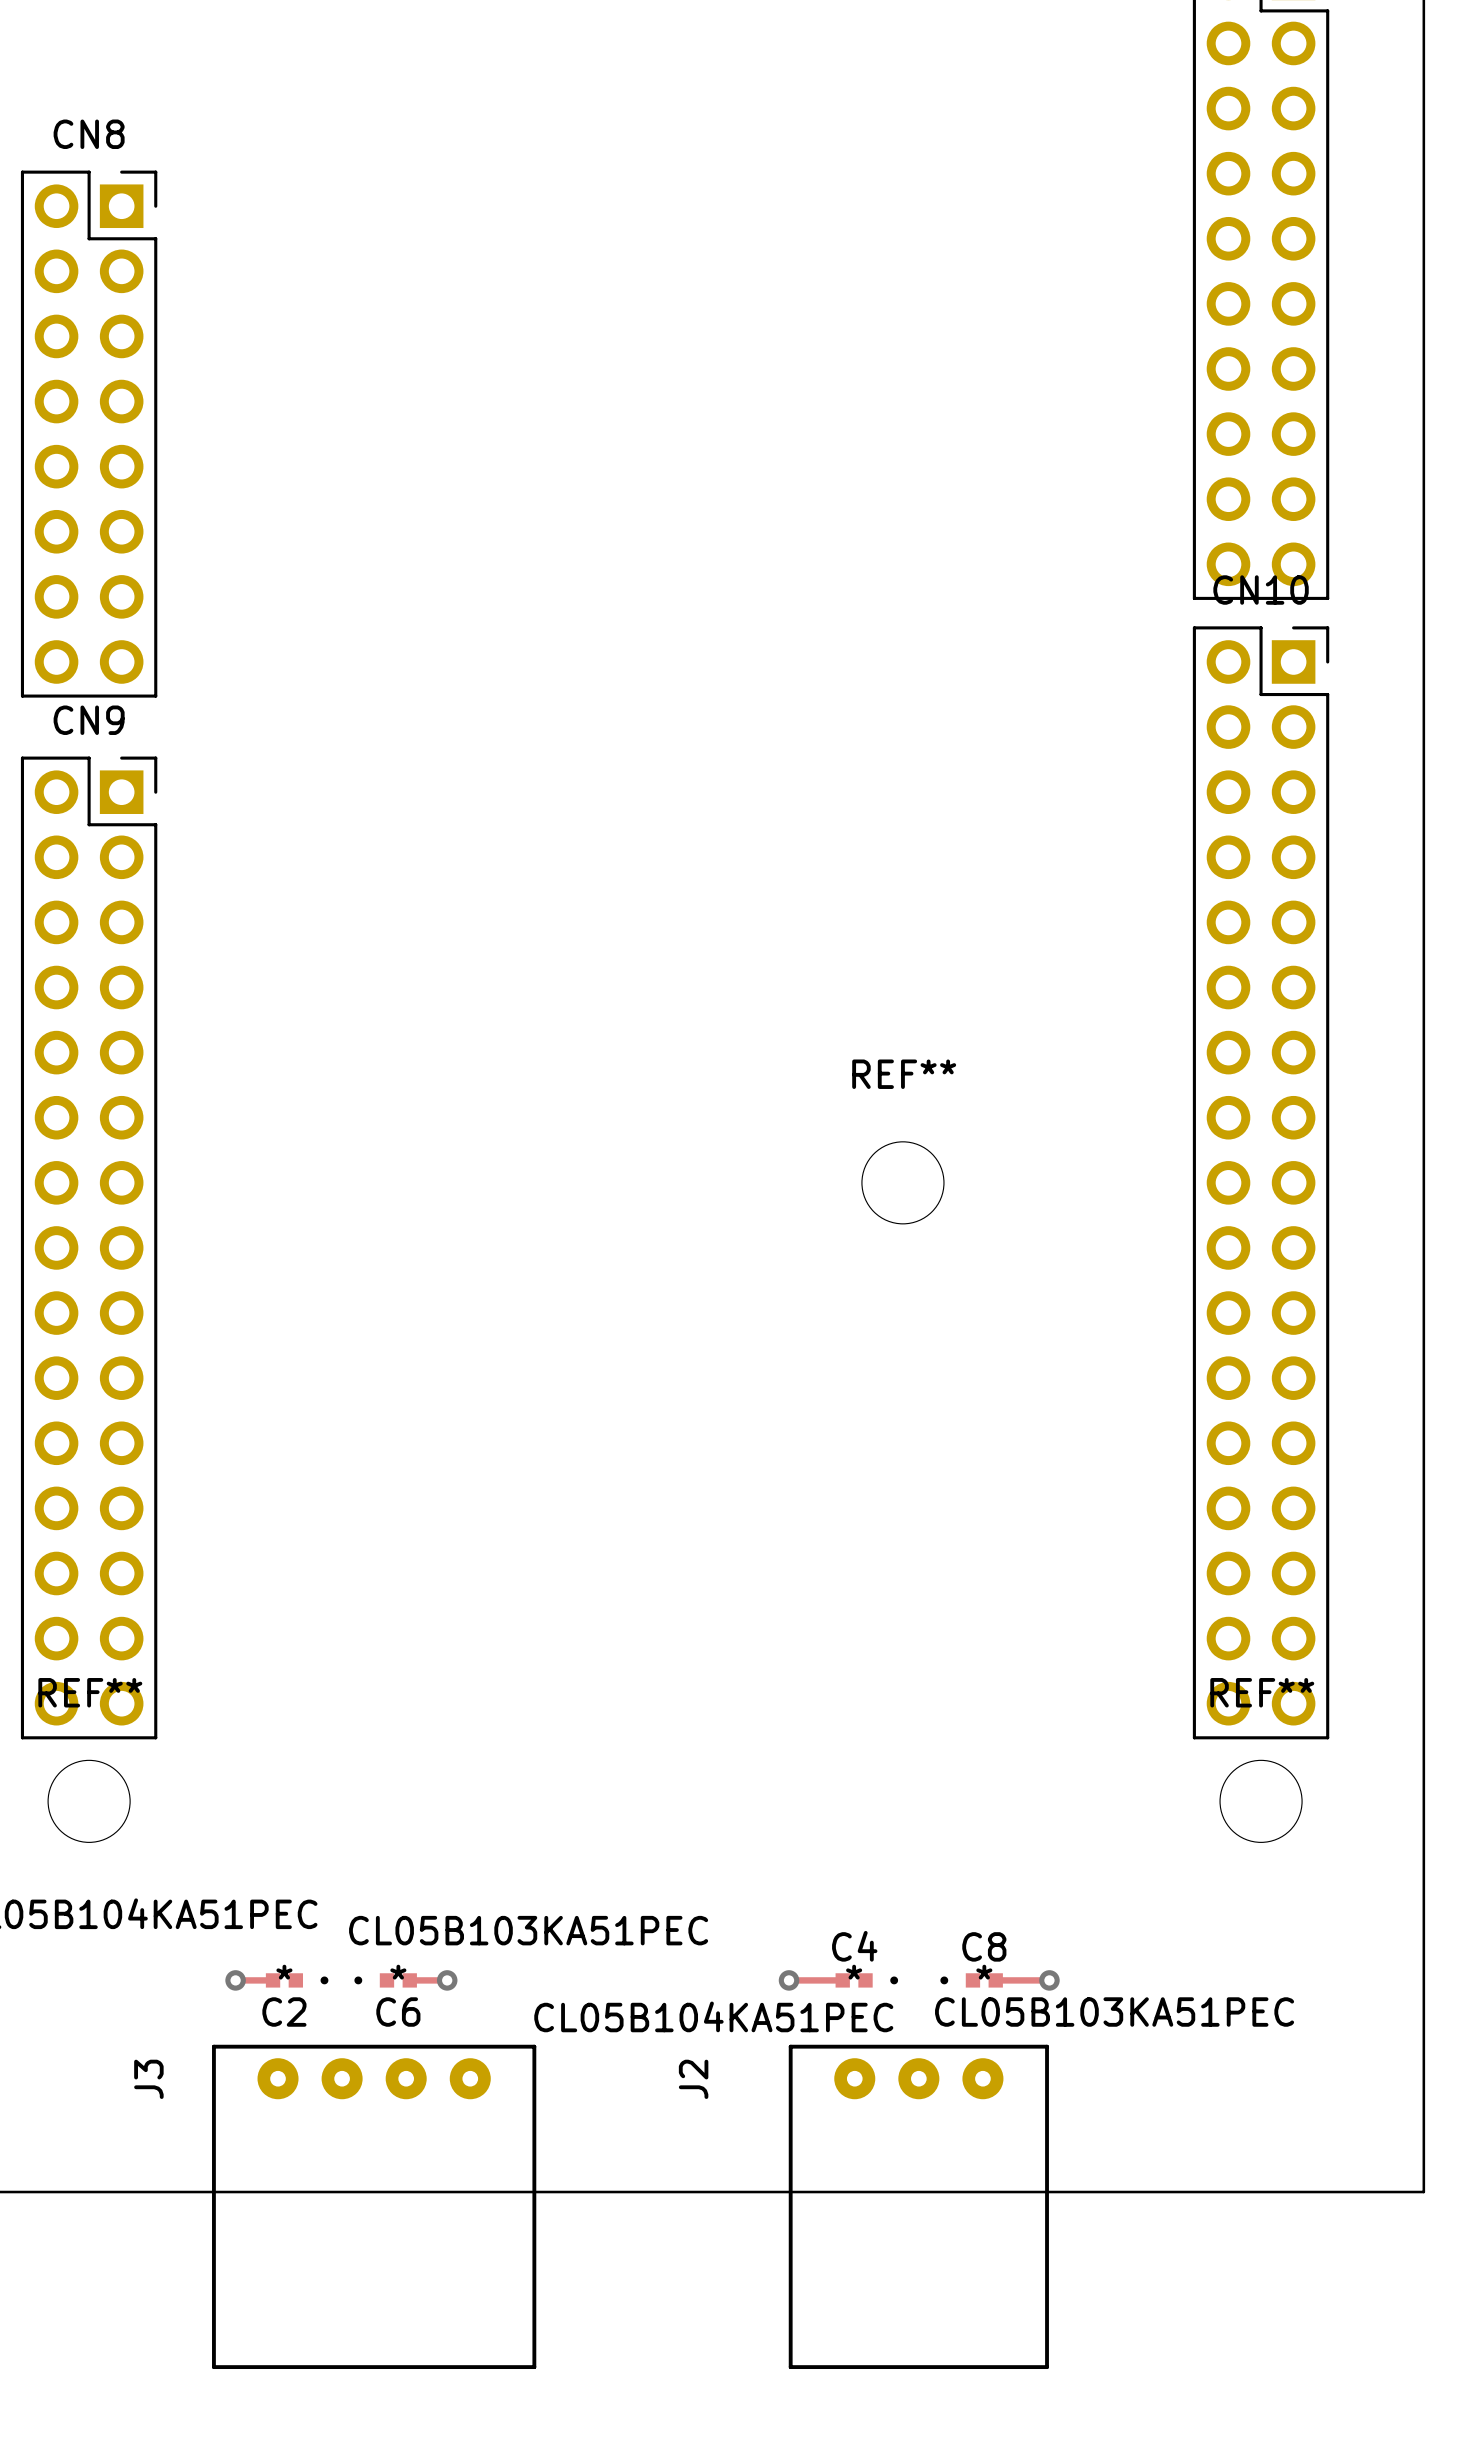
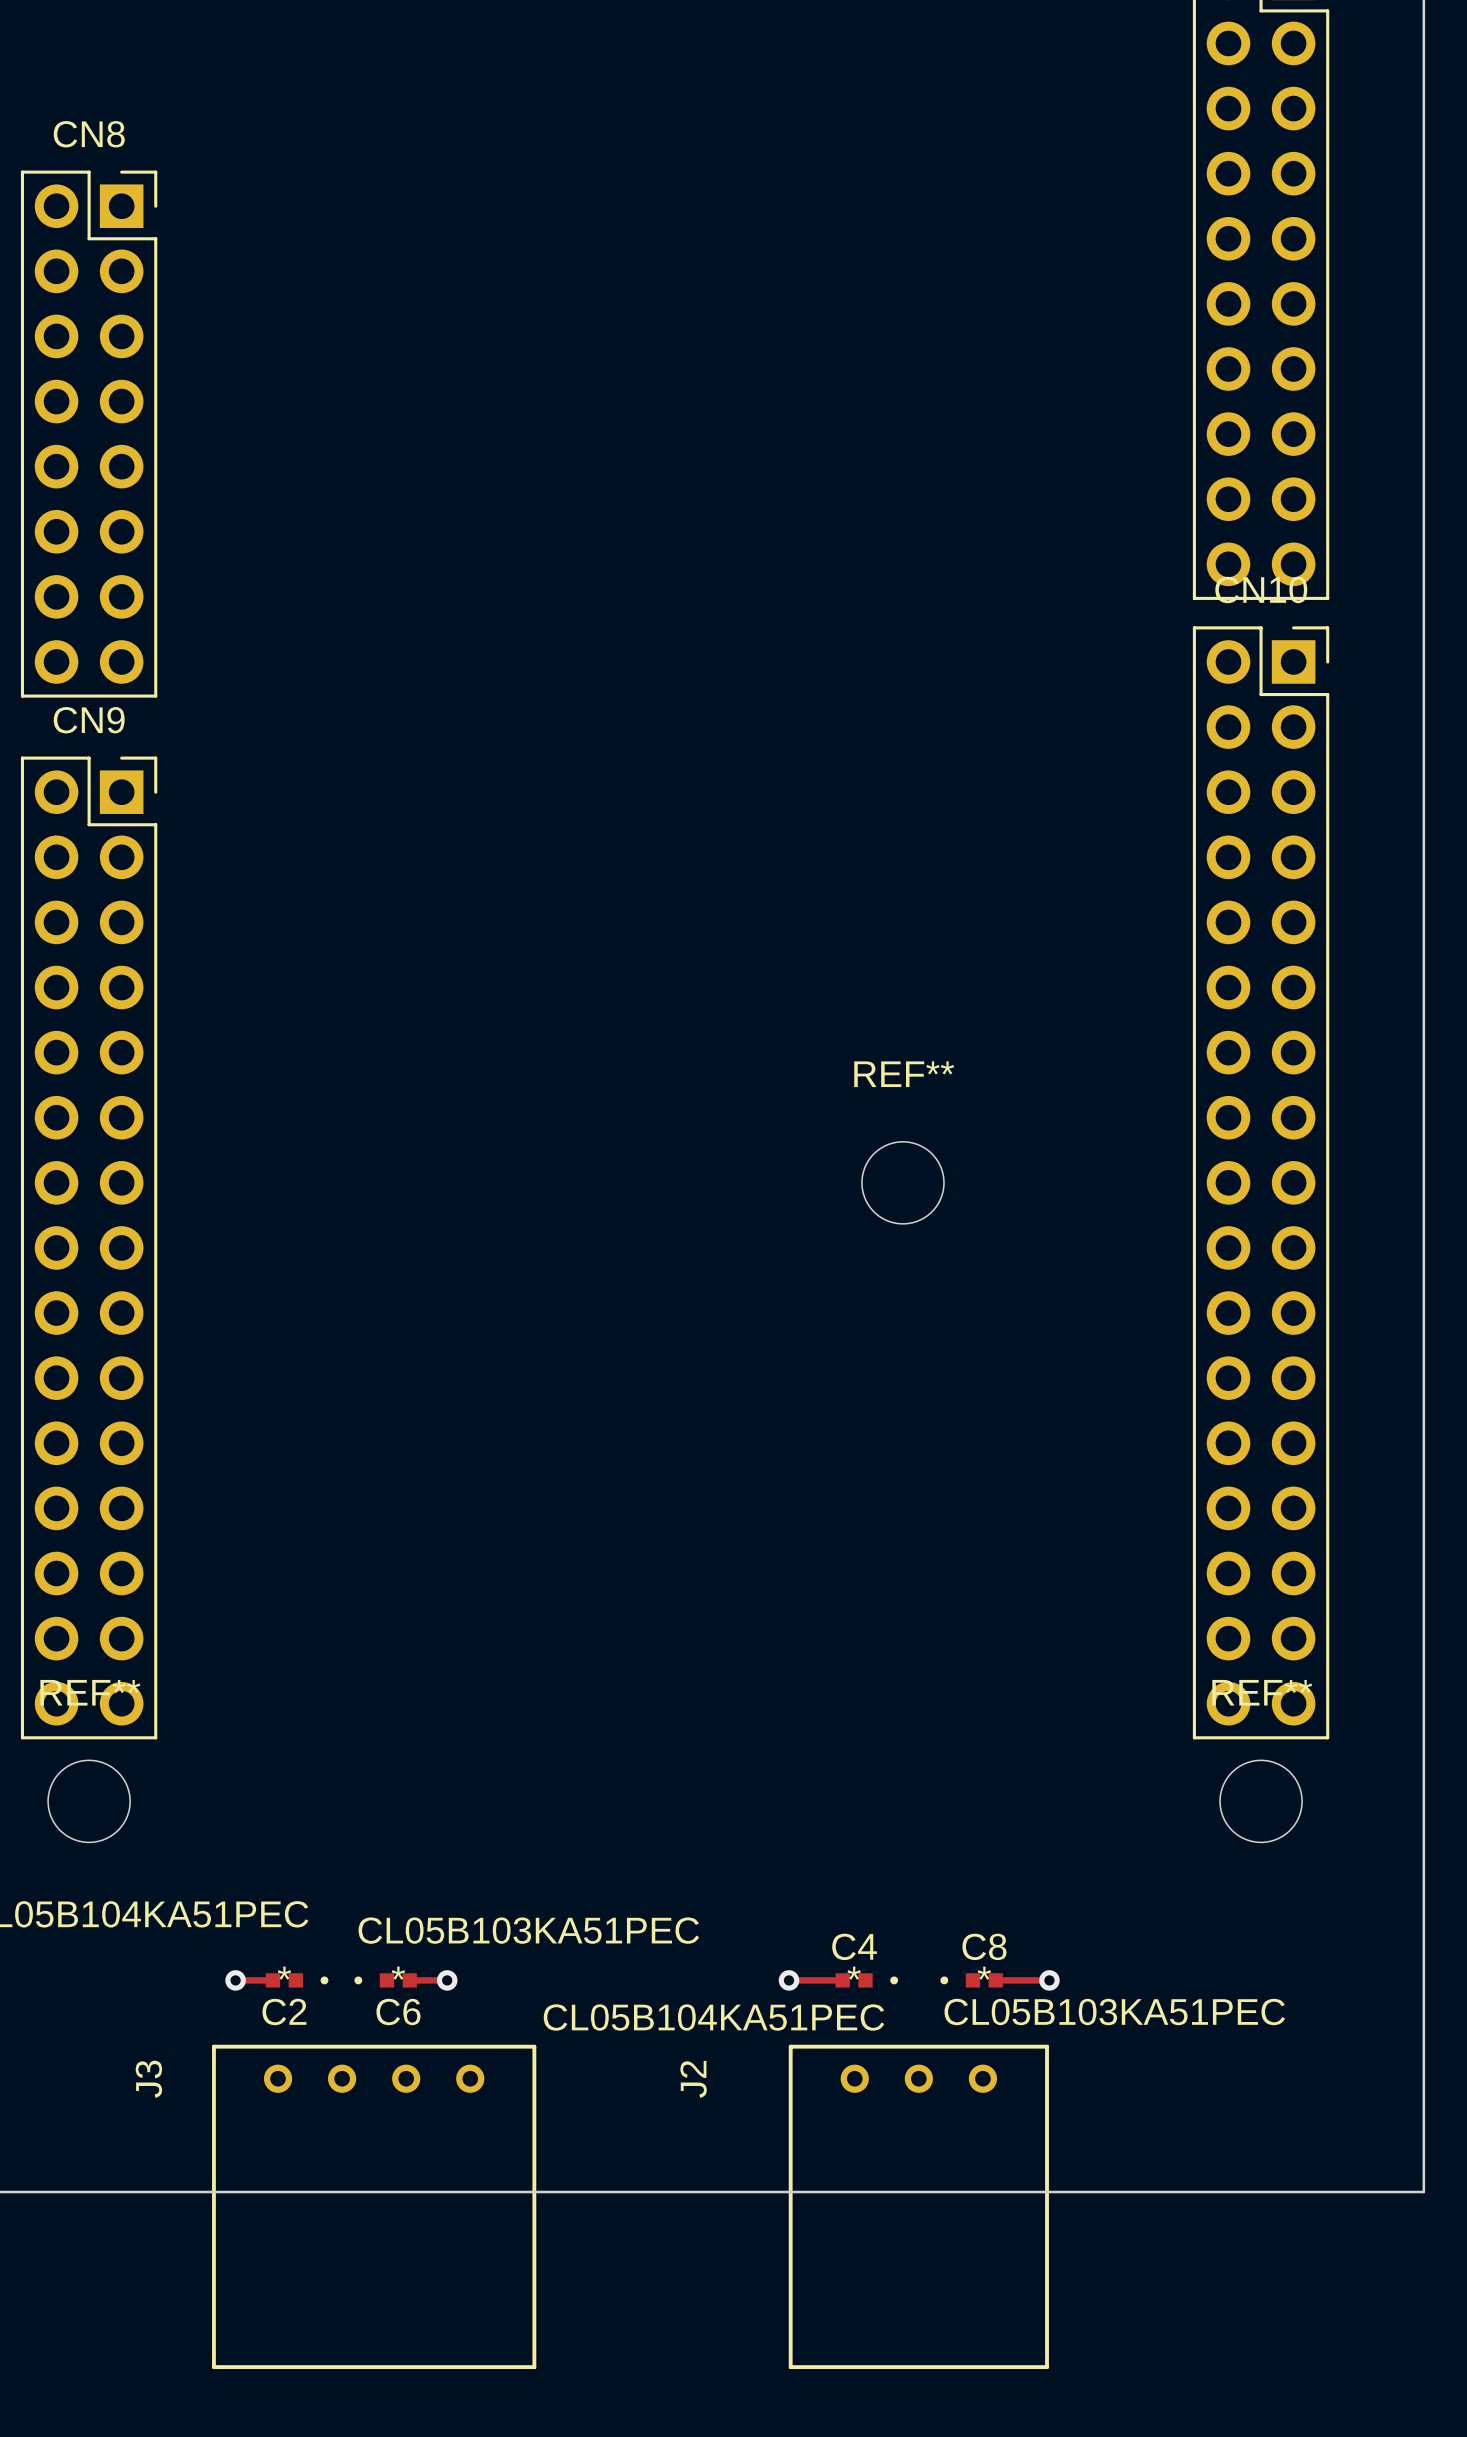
J3 footprint: [212, 2044, 537, 2370] -> [212, 2044, 537, 2370]
J2 footprint: [788, 2044, 1049, 2370] -> [788, 2044, 1049, 2370]

